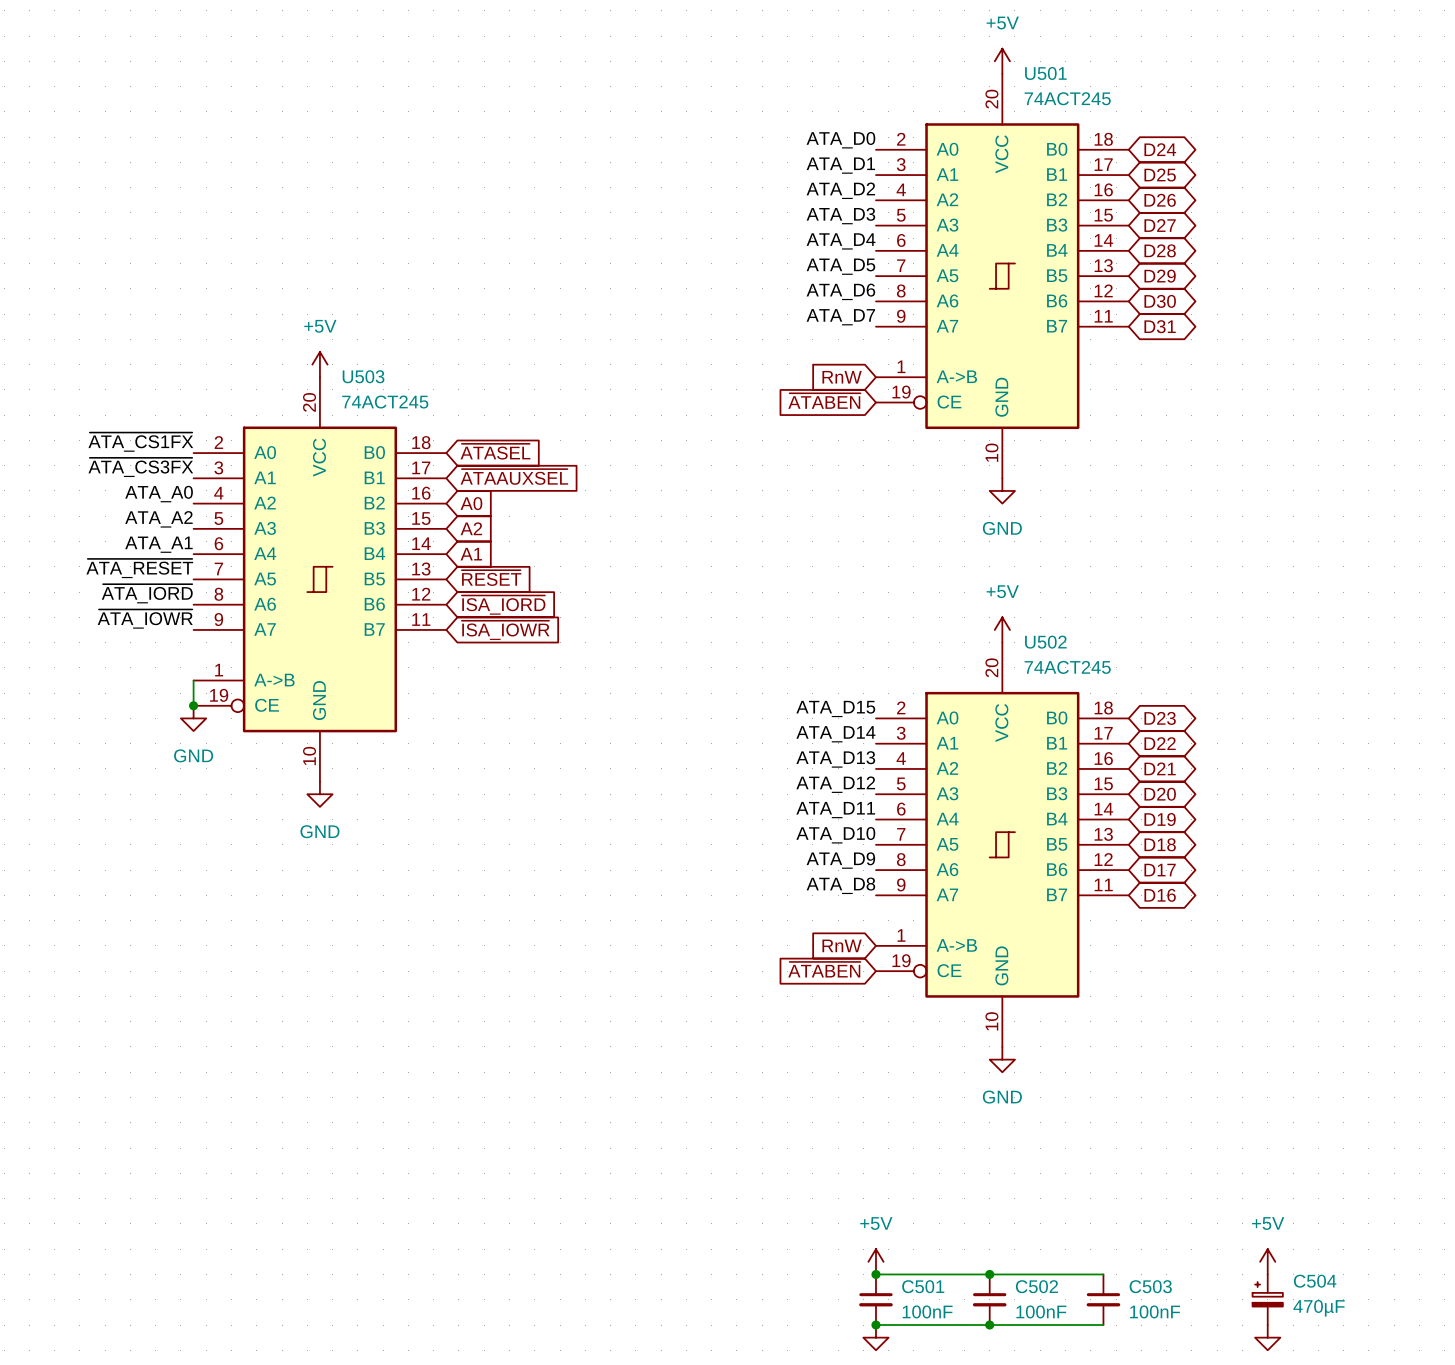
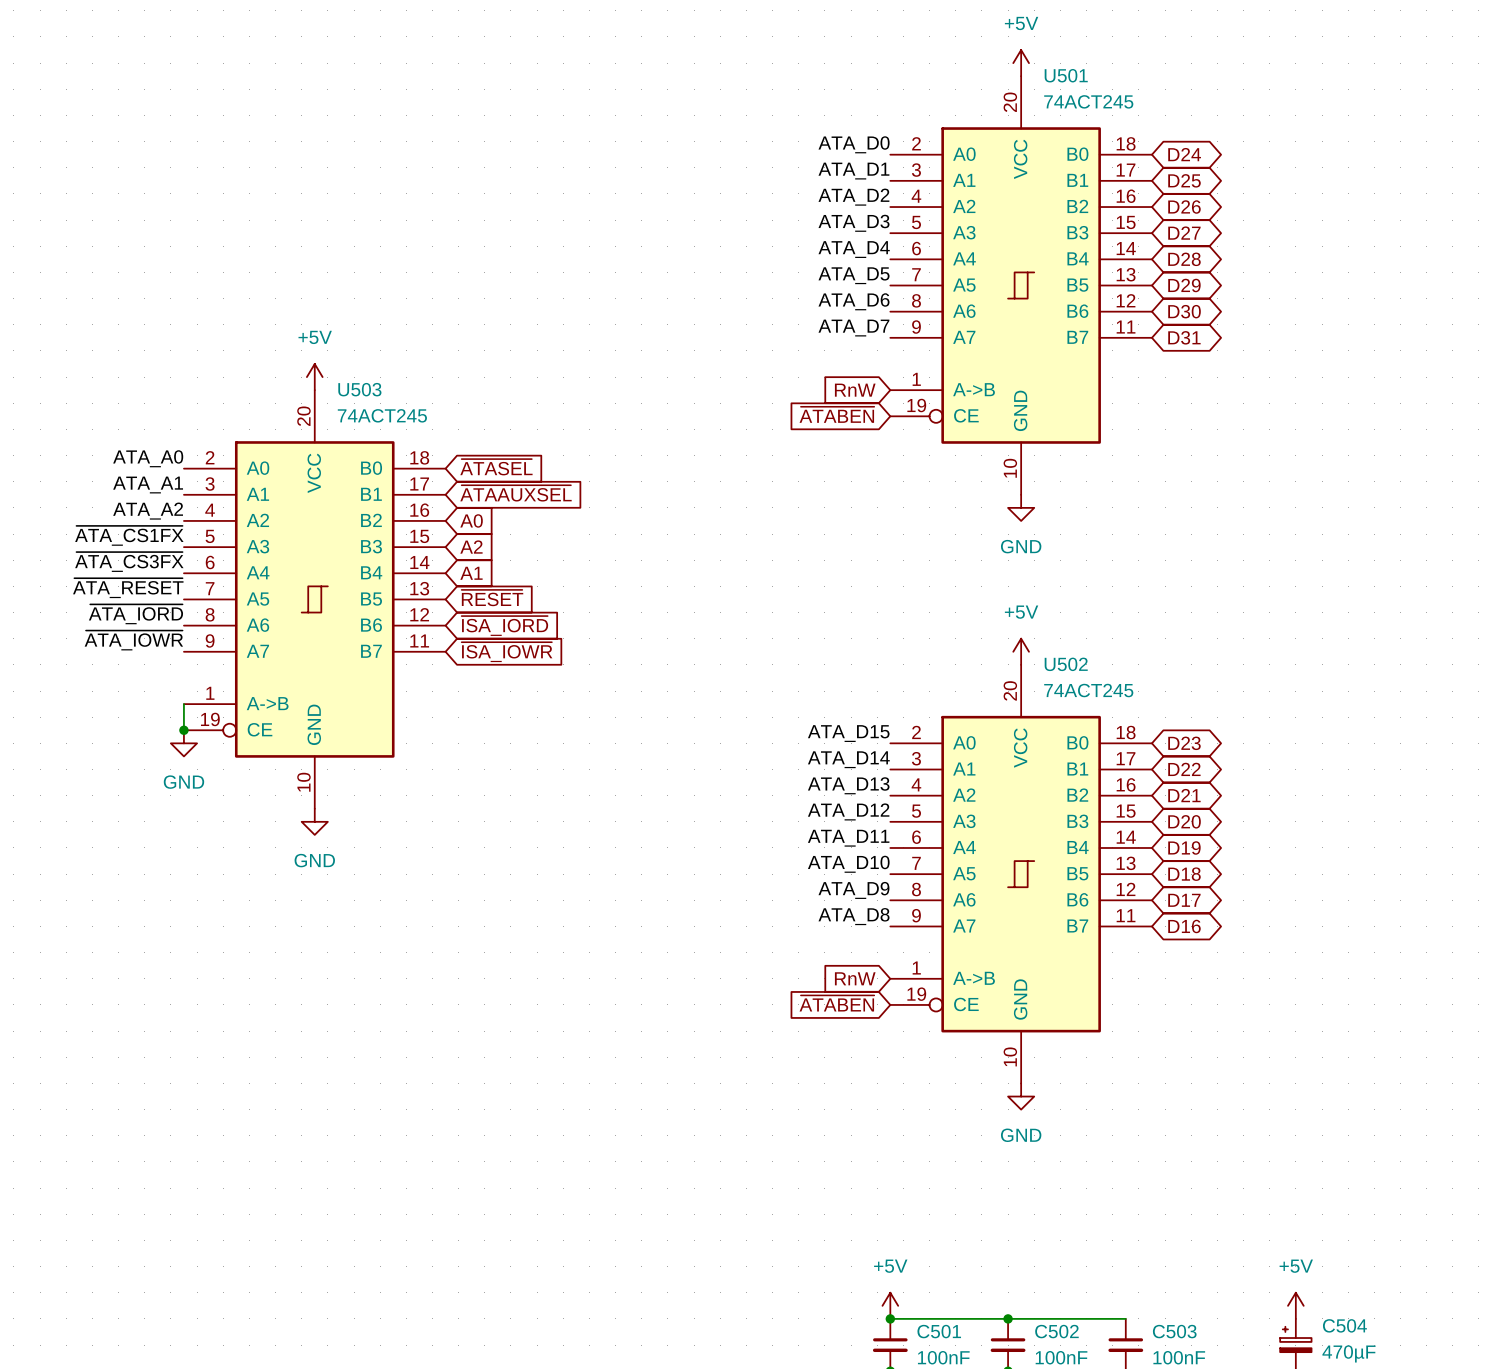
label: ~{ATA_CS1FX} (140, 442) -> ATA_A0 (148, 458)
label: ~{ATA_CS3FX} (140, 467) -> ATA_A1 (148, 485)
label: ATA_A0 (159, 494) -> ATA_A2 (148, 511)
label: ATA_A2 (158, 519) -> ~{ATA_CS1FX} (129, 535)
label: ATA_A1 (158, 544) -> ~{ATA_CS3FX} (129, 562)

